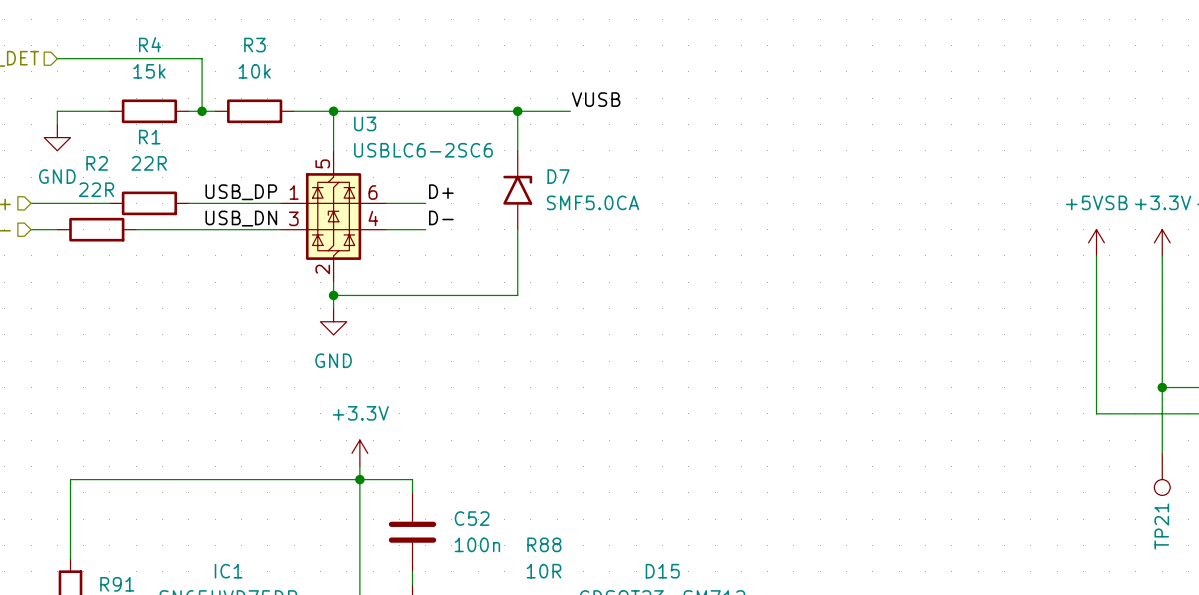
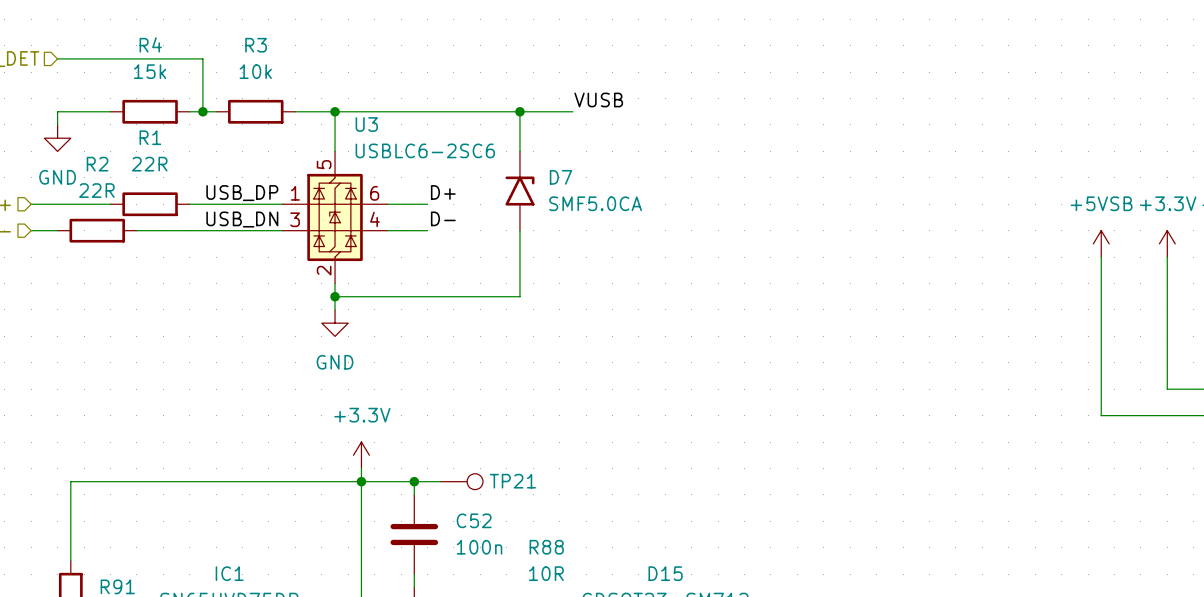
wire: (1162, 387) (1162, 453) -> none
junction: (1162, 387) -> none
TP21 position: (1162, 474) -> (461, 481)
wire: none -> (414, 481) (440, 481)
junction: none -> (414, 481)
TP21 rotation: 0° (1162, 487) -> 90° counterclockwise (475, 481)

